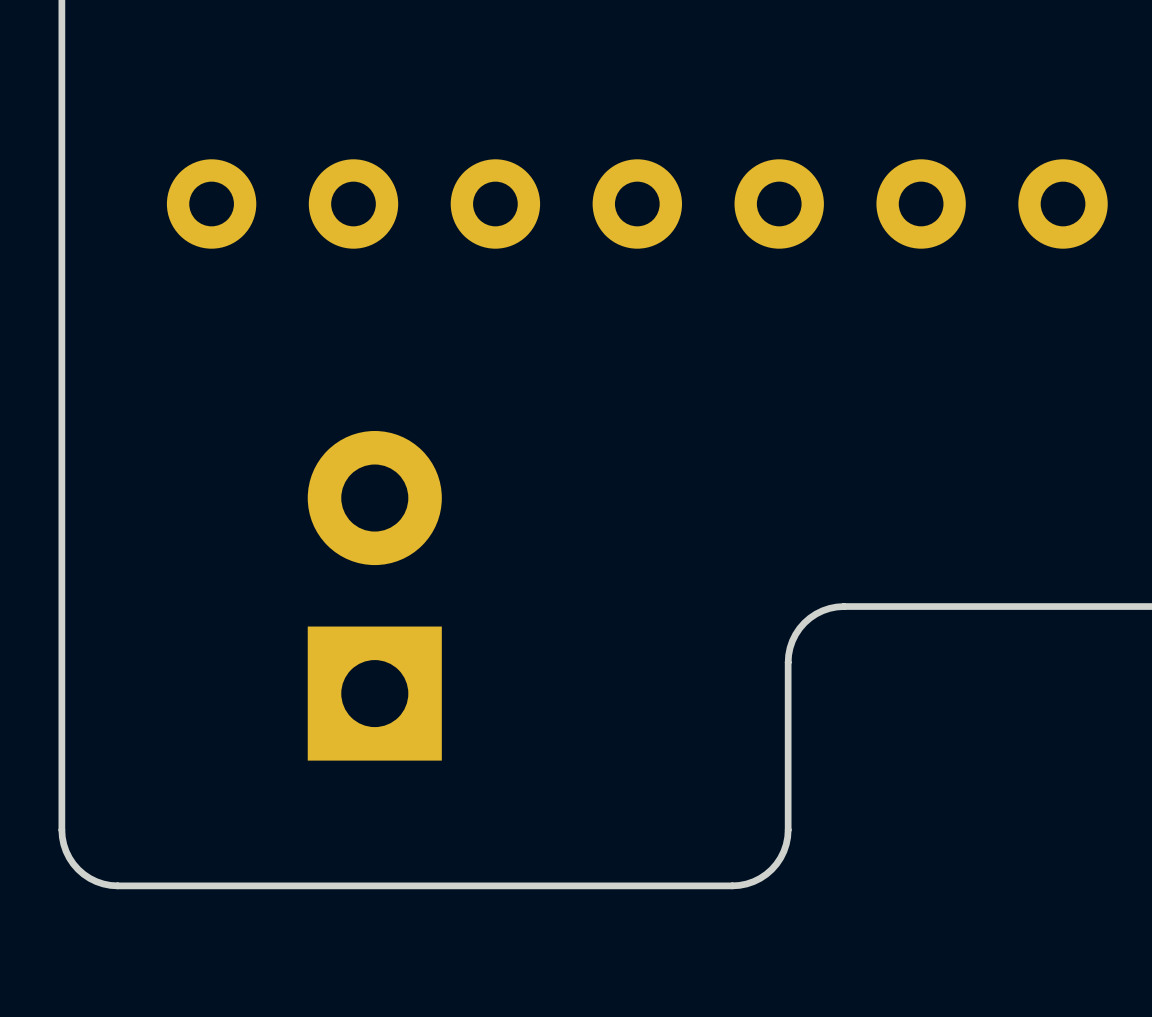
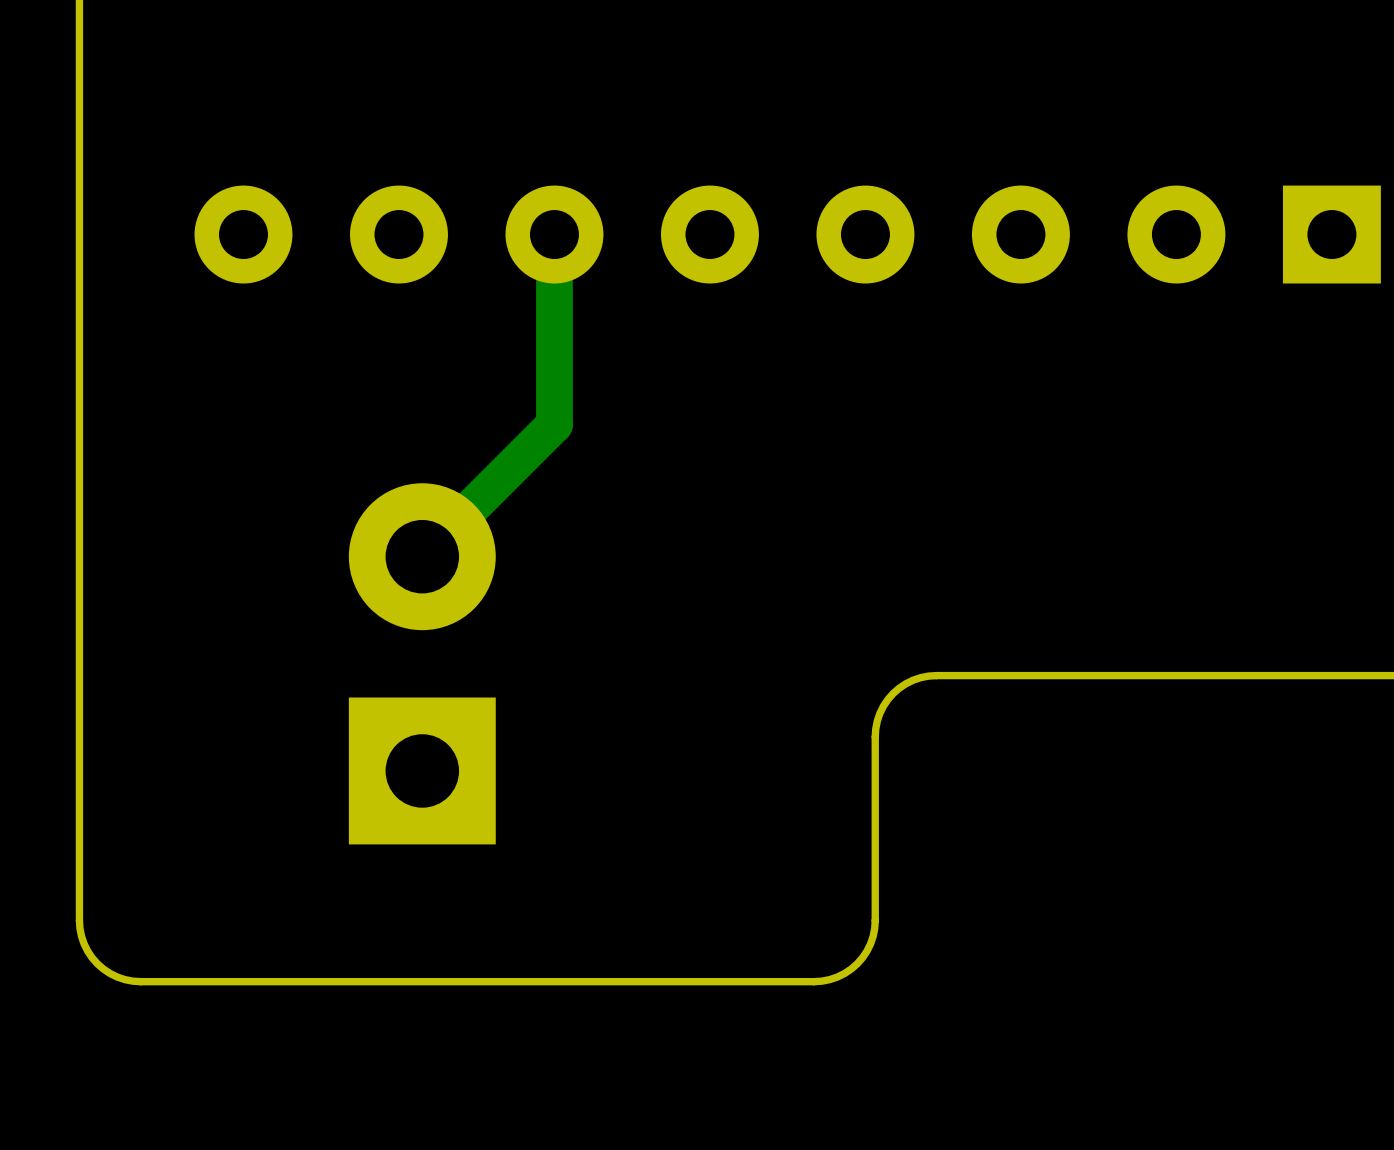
track: none -> (554, 234) (554, 424) (422, 556)

